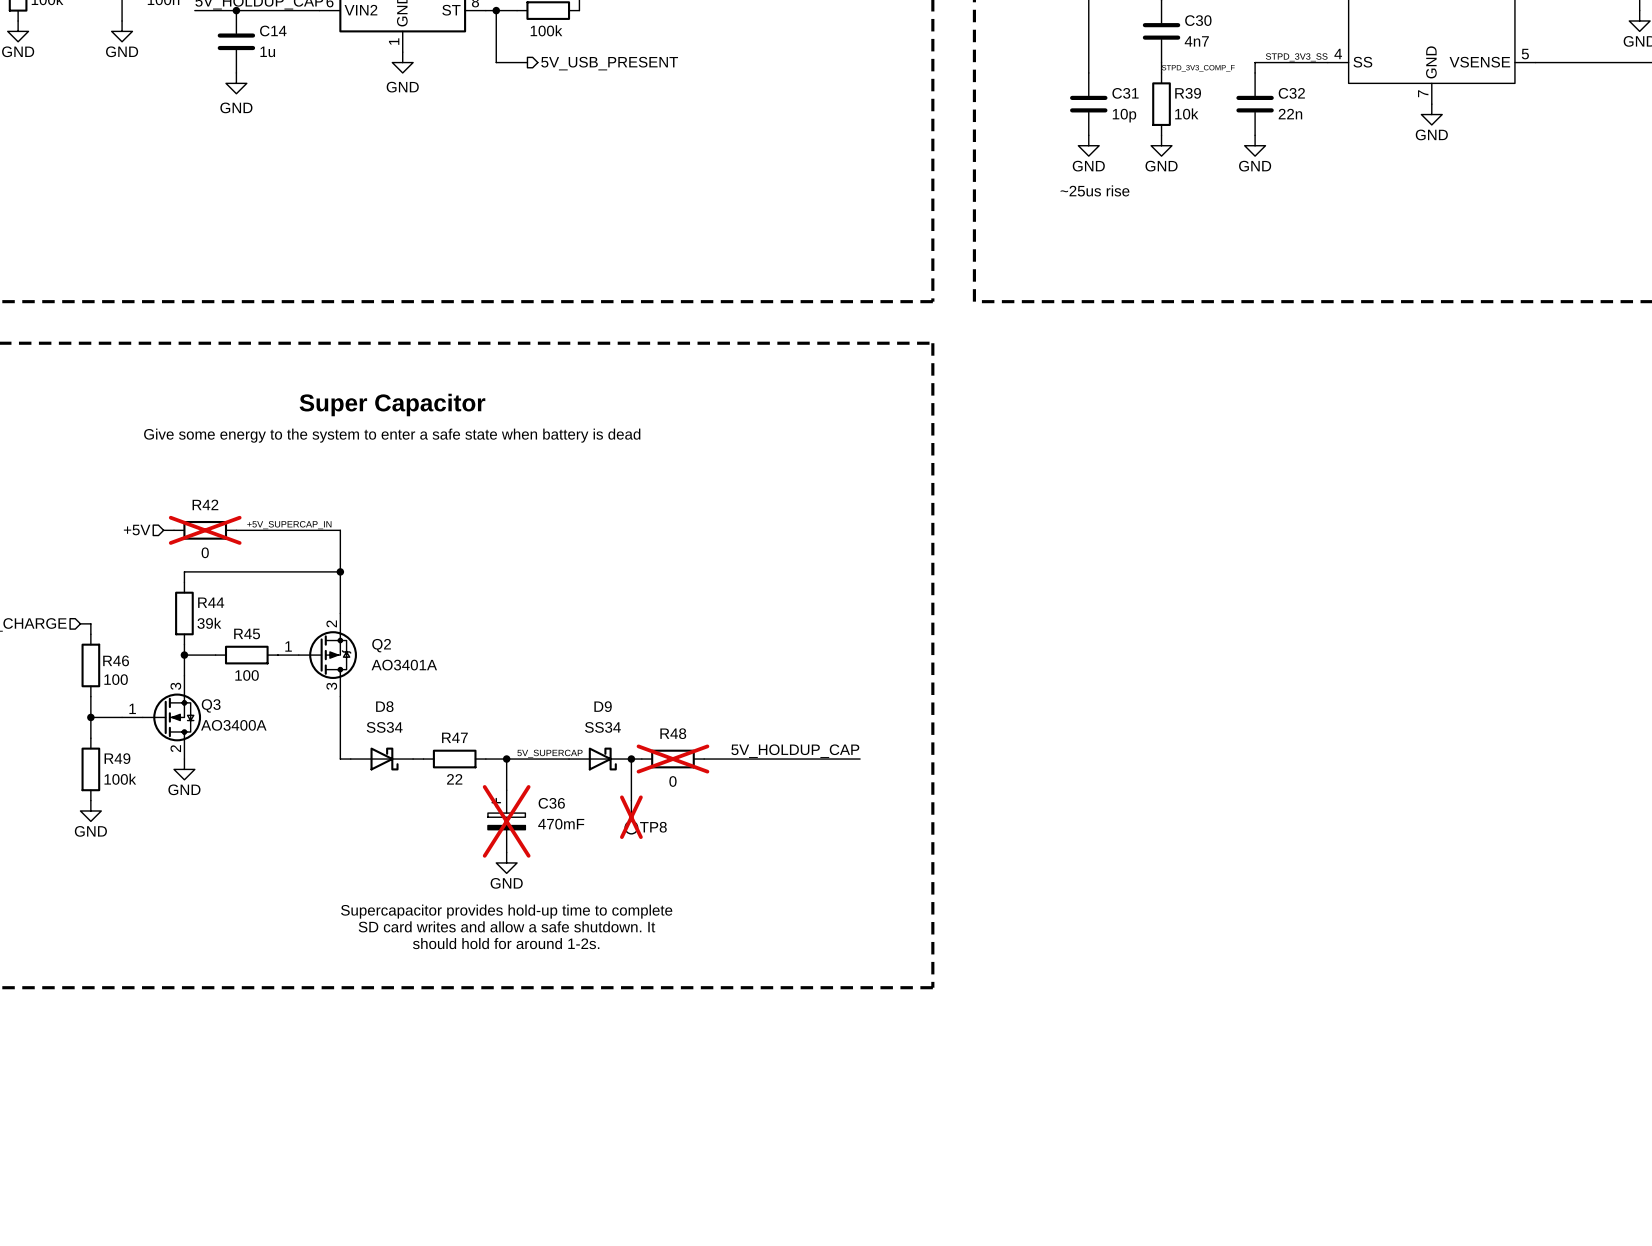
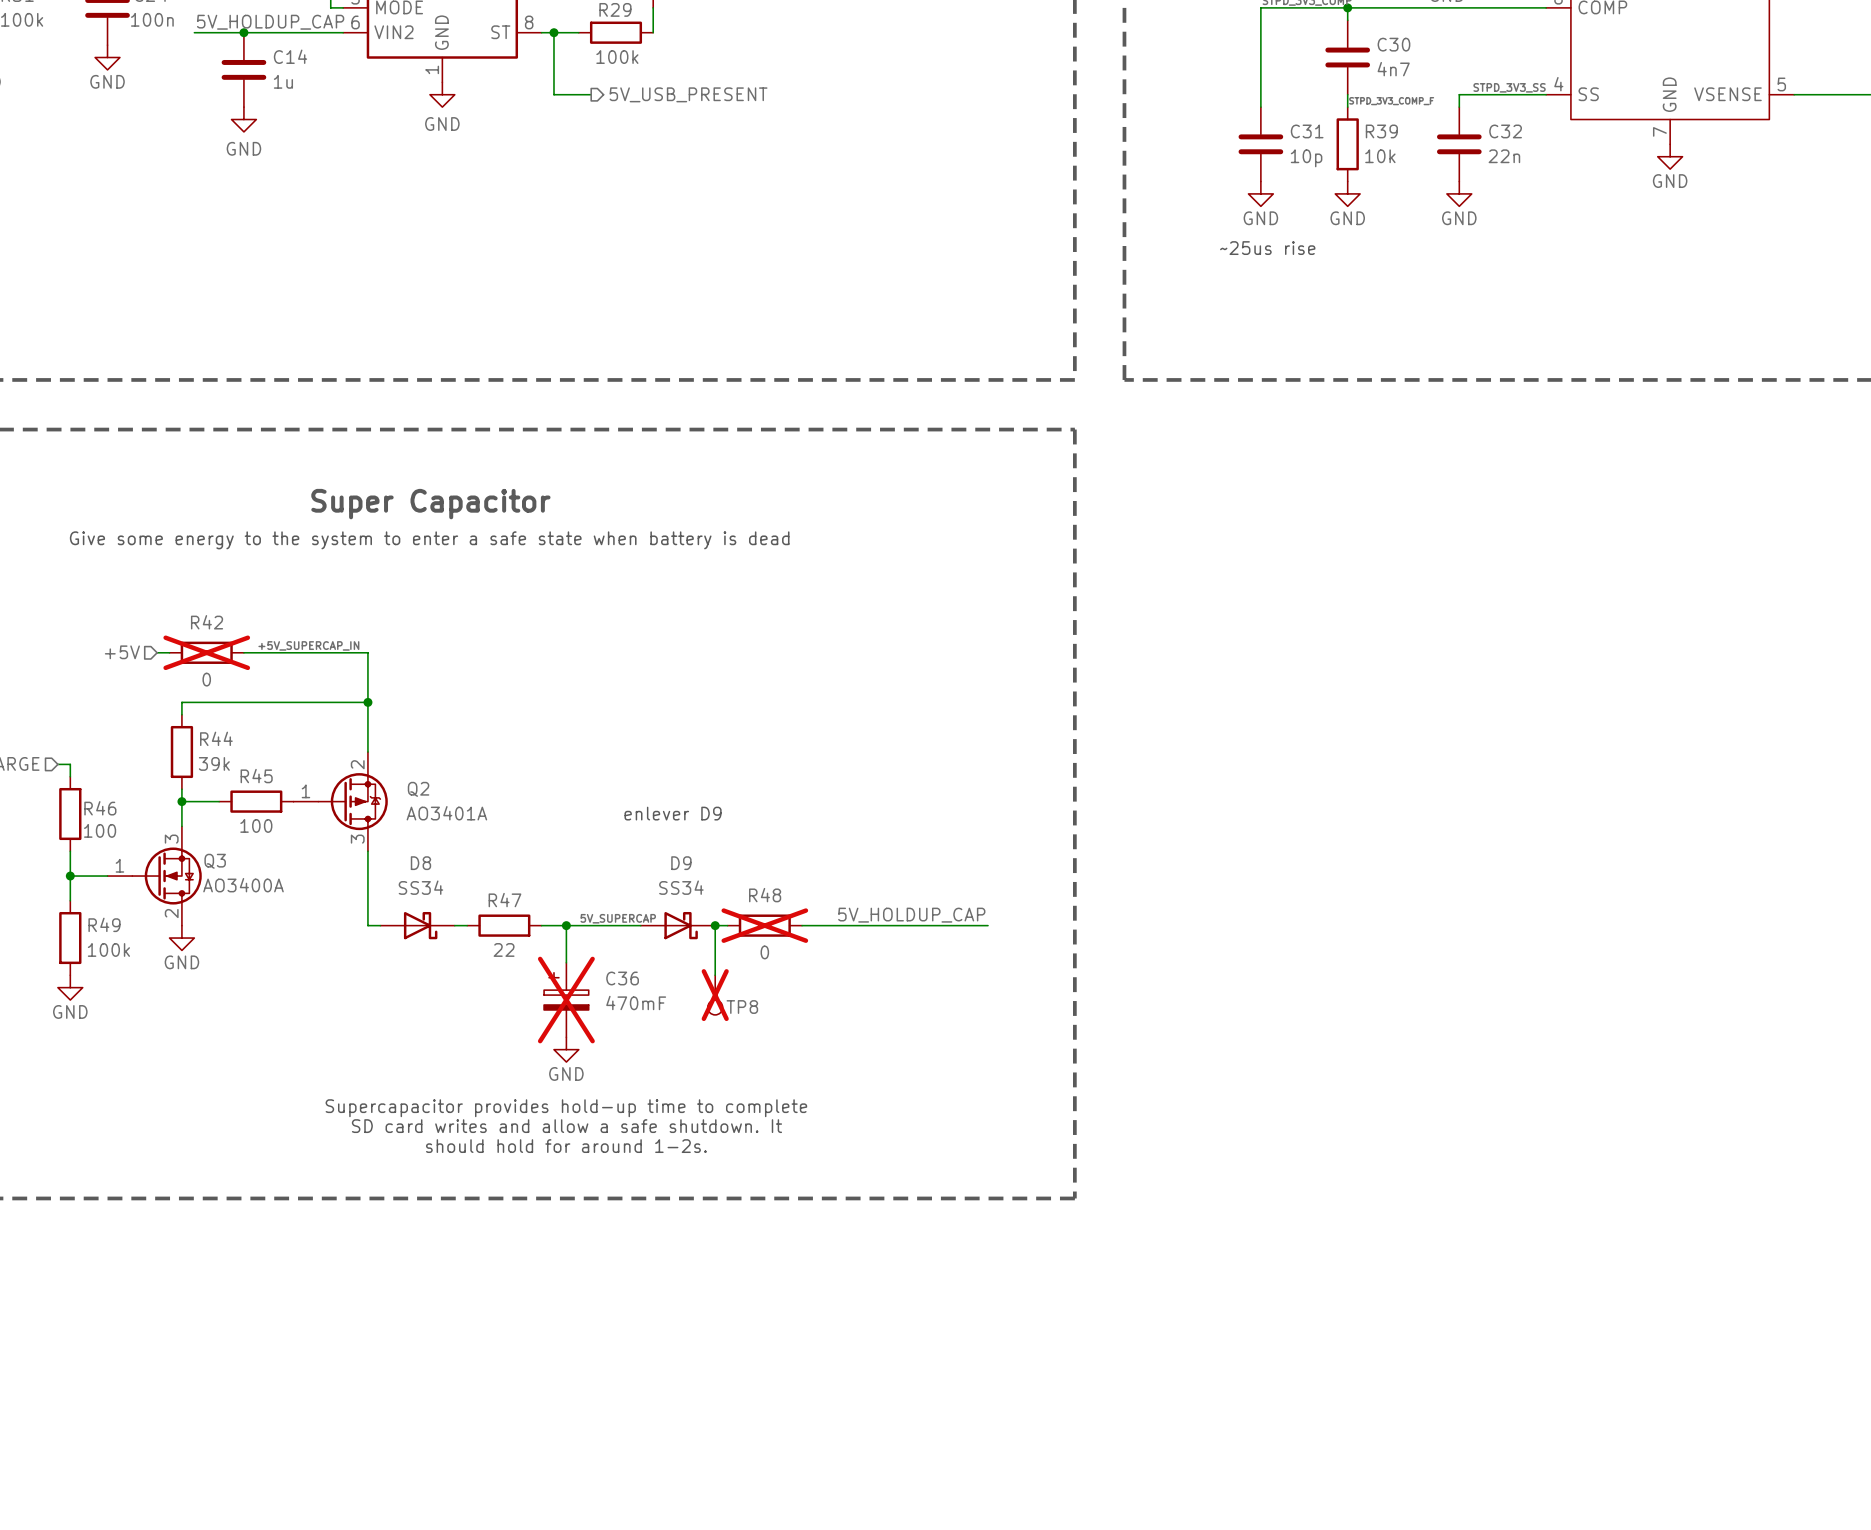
text: none -> enlever D9 (673, 813)

